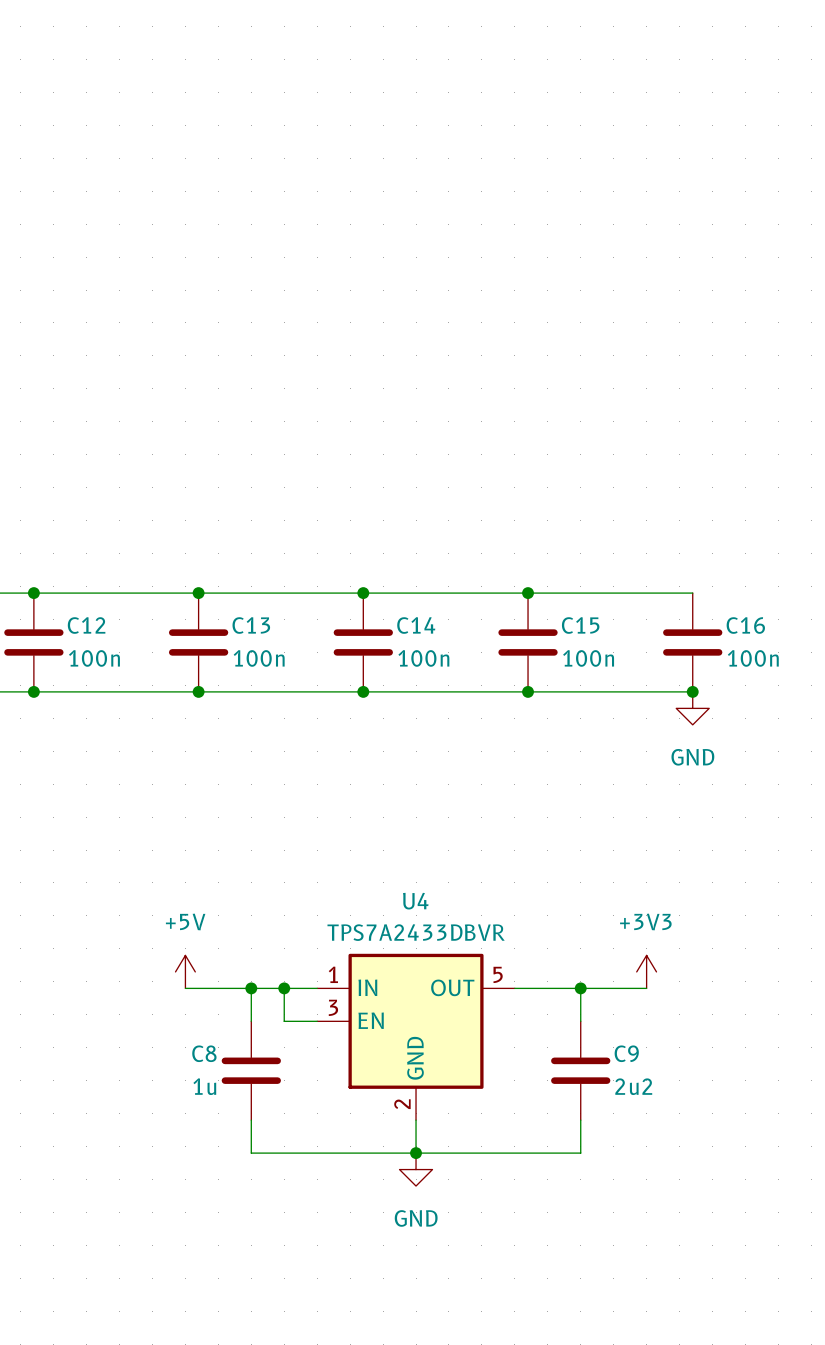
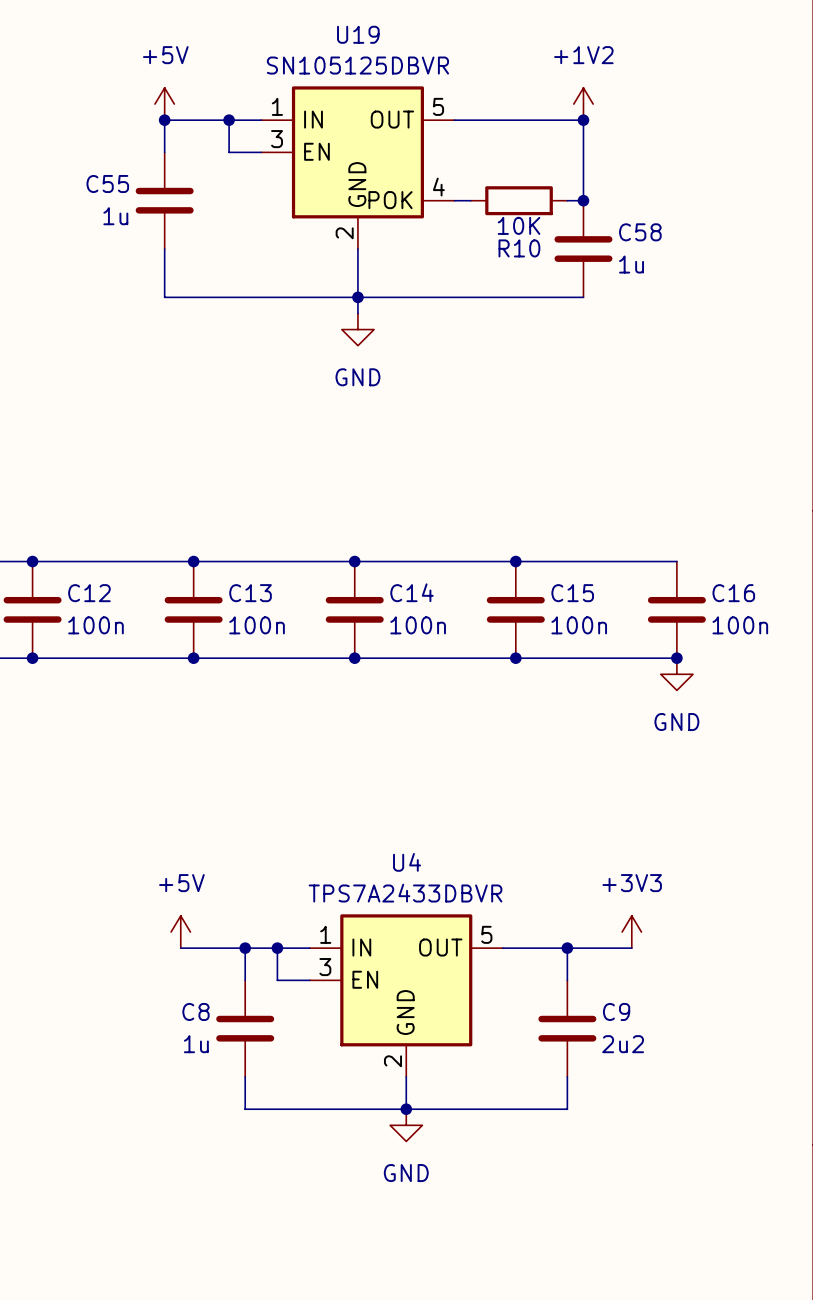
power symbol: none -> +5V (164, 104)
power symbol: none -> +1V2 (583, 104)
junction: none -> (164, 120)
wire: none -> (229, 120) (229, 152) (261, 152)
junction: none -> (229, 120)
wire: none -> (261, 120) (164, 120) (164, 152)
wire: none -> (454, 120) (583, 120) (583, 200) (567, 200)
junction: none -> (583, 120)
U19: none -> SN105125DBVR (357, 167)
C55: none -> 1u (164, 200)
wire: none -> (454, 200) (470, 200)
R10: none -> 10K (519, 200)
junction: none -> (583, 200)
wire: none -> (164, 249) (164, 297) (583, 297)
wire: none -> (357, 249) (357, 313)
C58: none -> 1u (583, 249)
junction: none -> (357, 297)
power symbol: none -> GND (357, 329)

